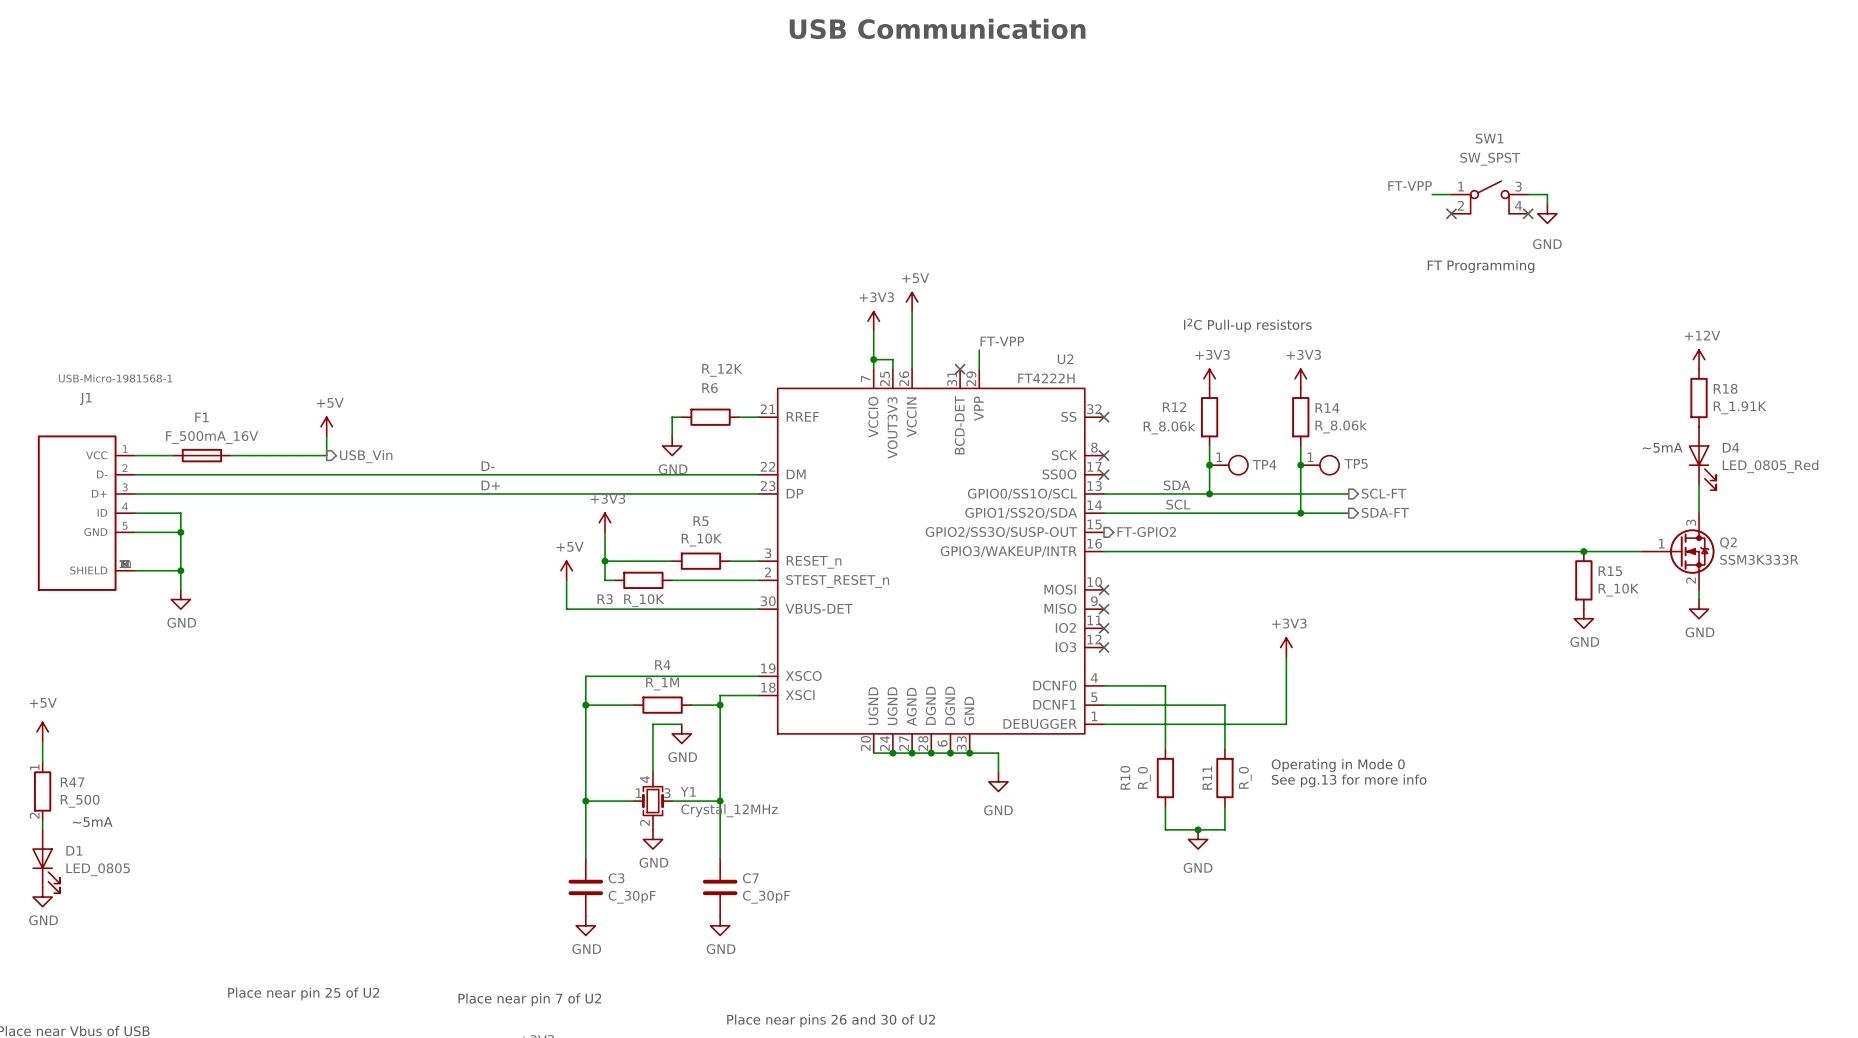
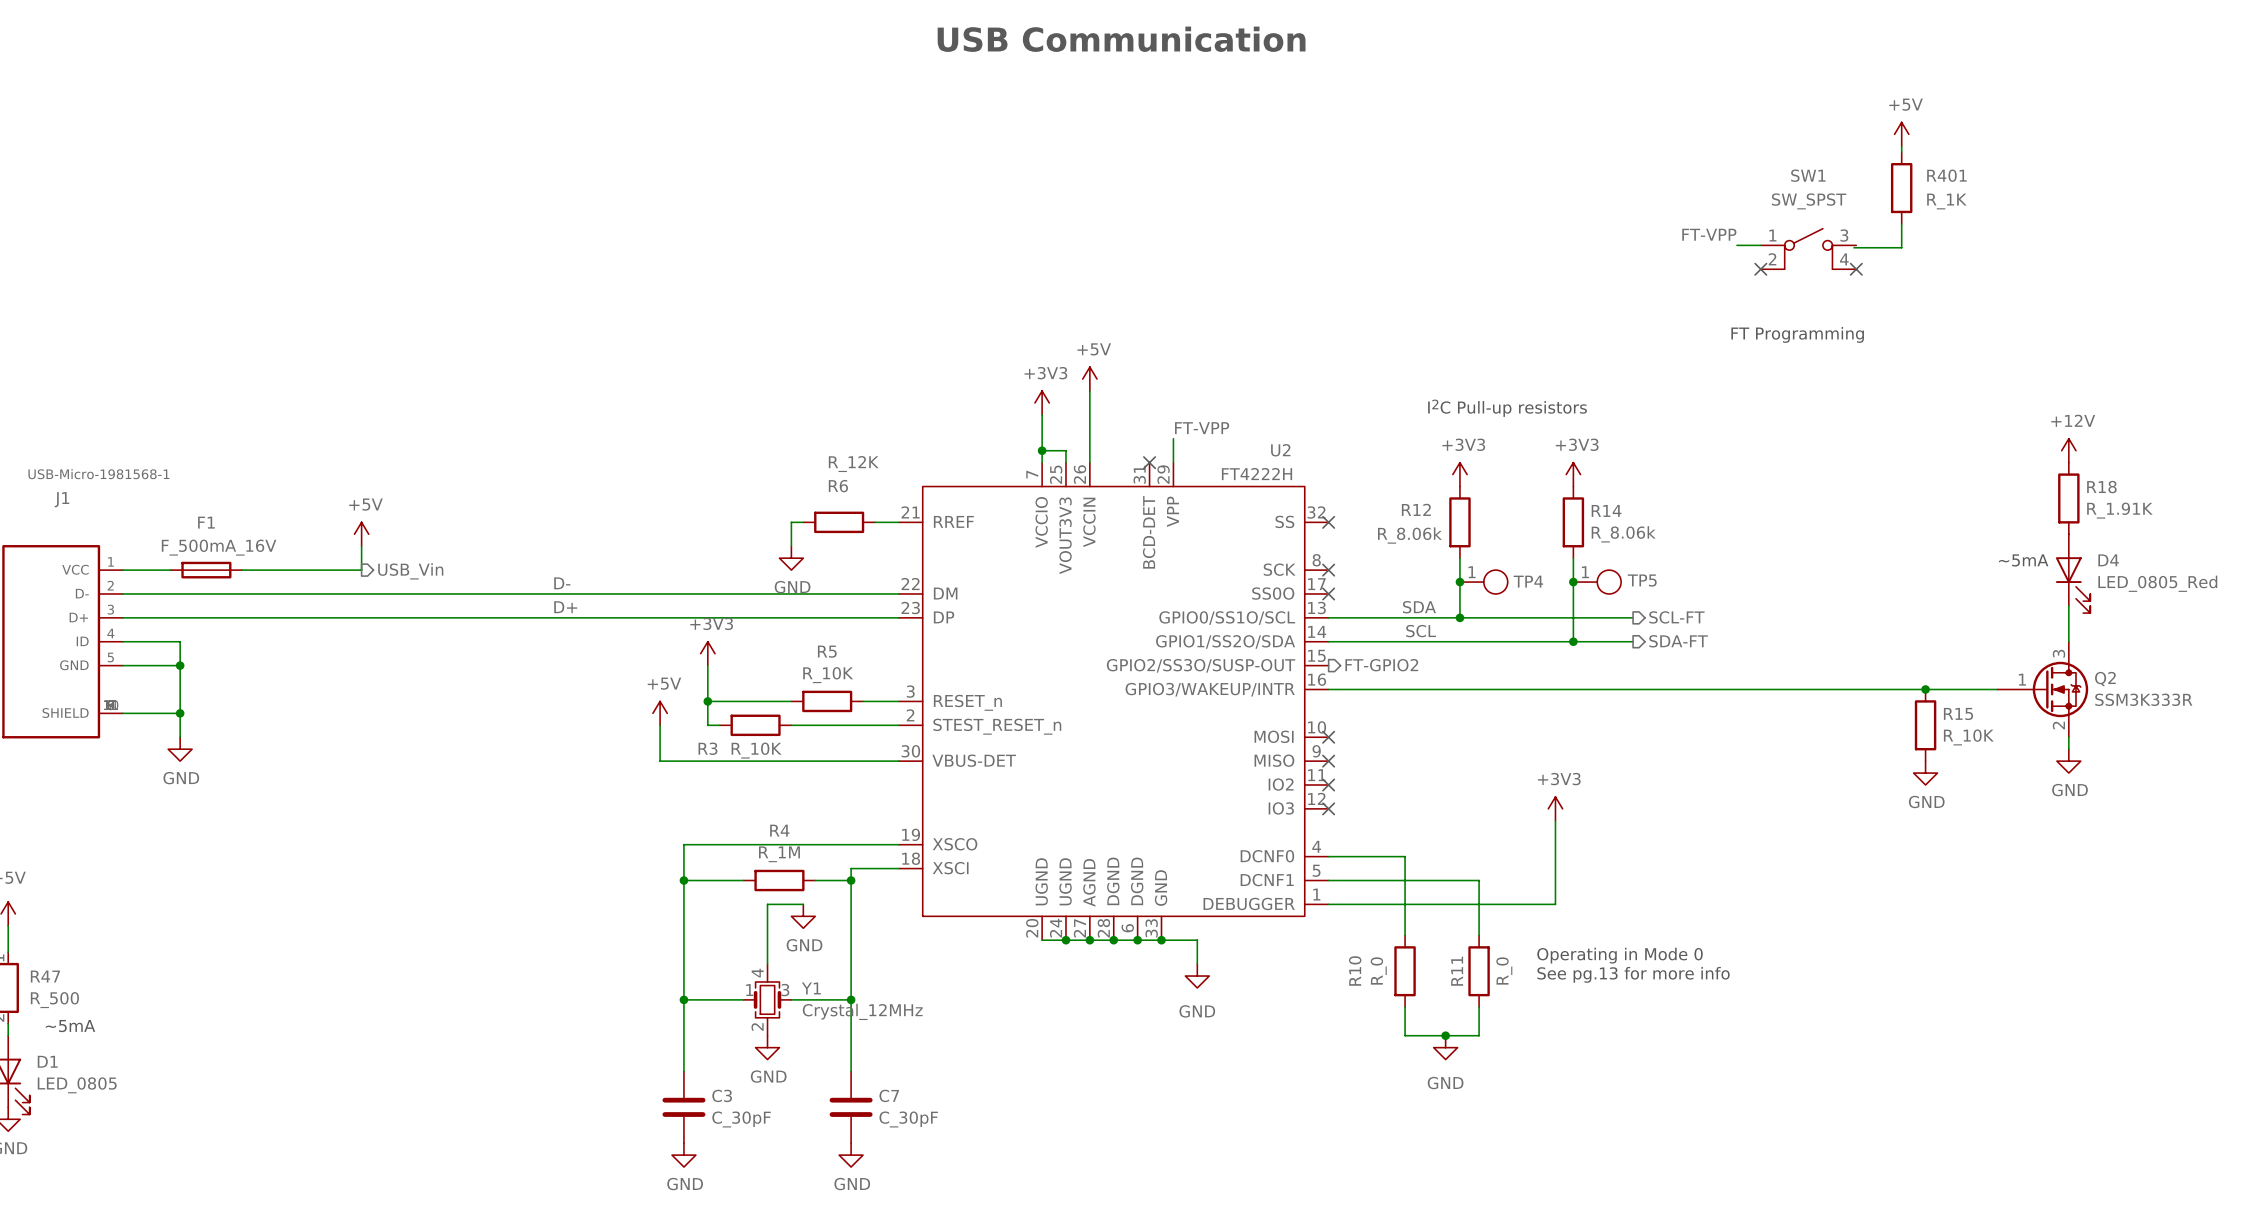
power symbol: none -> +5V (1901, 134)
wire: none -> (1901, 146) (1901, 152)
R401: none -> R_1K (1901, 188)
wire: none -> (1901, 223) (1901, 247) (1853, 247)
wire: (1528, 194) (1547, 194) (1547, 204) -> none
power symbol: GND (1547, 213) -> none

